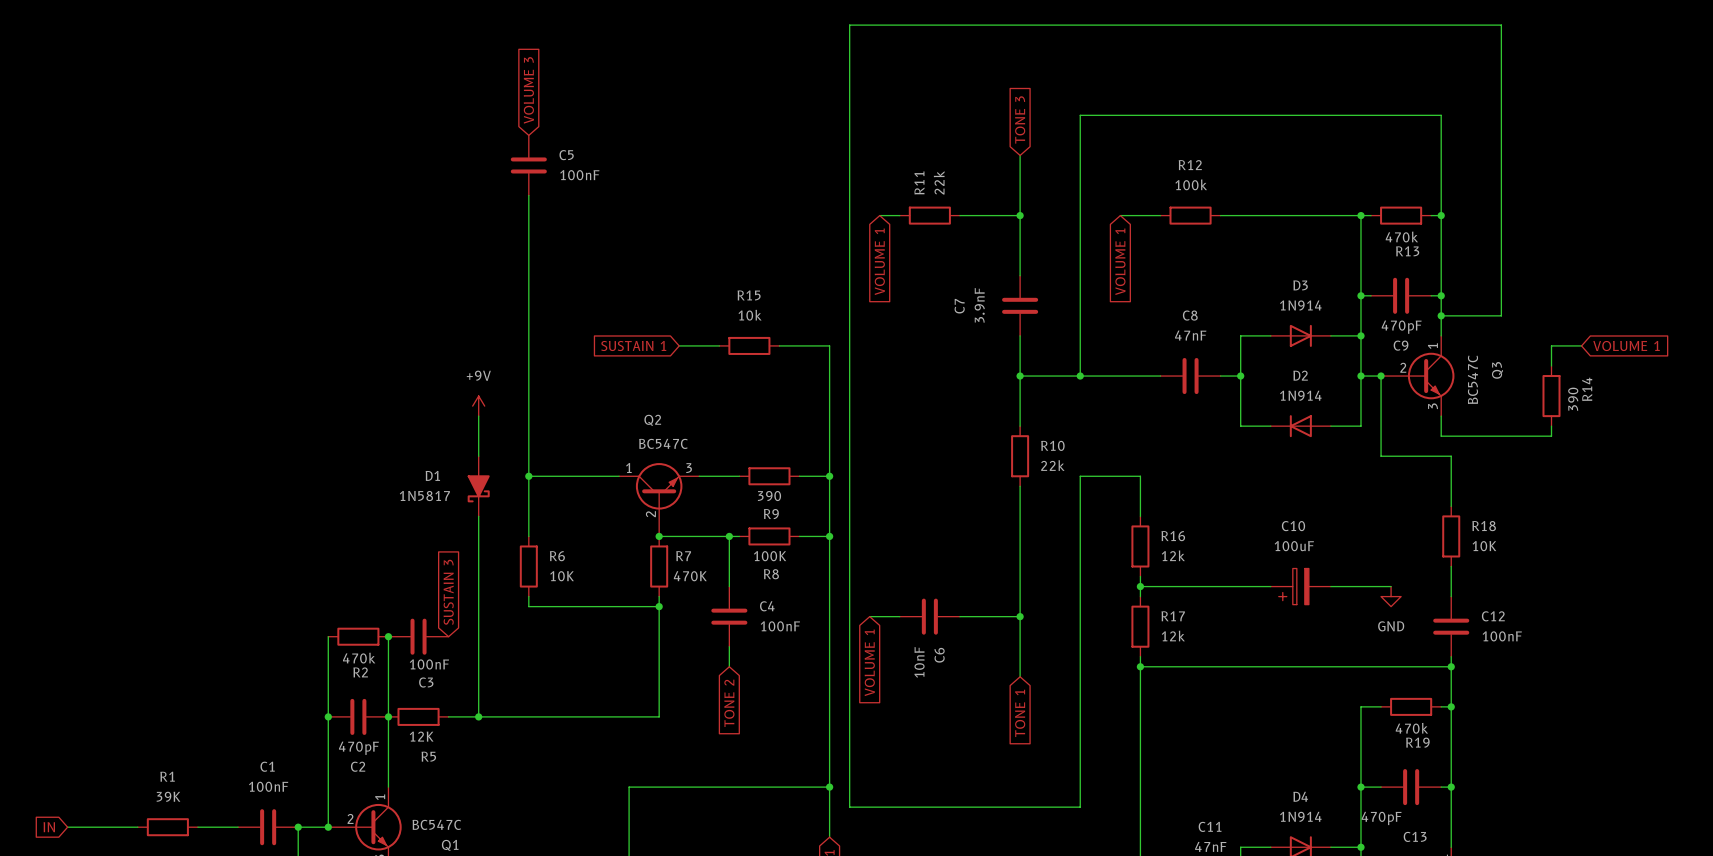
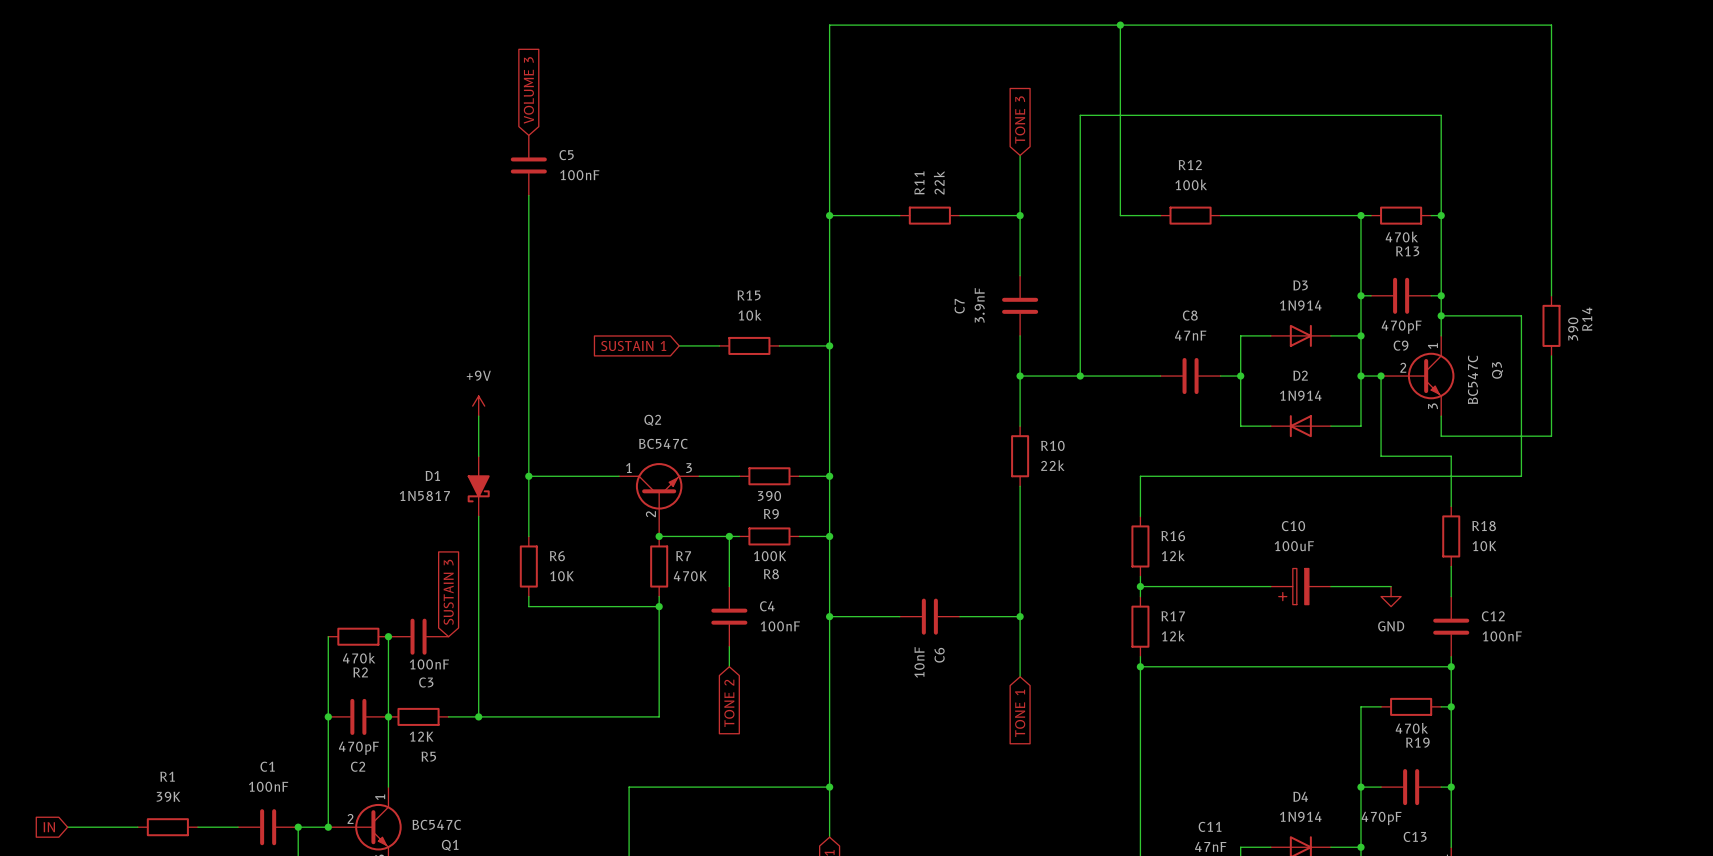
wire: (849, 25) (849, 807) (1080, 807) (1080, 476) (1140, 476) -> (849, 25) (829, 25) (829, 345)
wire: none -> (1120, 25) (1120, 215)
junction: none -> (1120, 25)
wire: (1501, 25) (1501, 315) -> (1501, 25) (1551, 25) (1551, 295)
wire: none -> (829, 215) (879, 215)
junction: none -> (829, 215)
global label: VOLUME 1 (879, 261) -> none
global label: VOLUME 1 (1120, 261) -> none
wire: none -> (1501, 315) (1521, 315) (1521, 476) (1140, 476)
junction: none -> (829, 345)
wire: (1581, 345) (1551, 345) (1551, 355) -> none
global label: VOLUME 1 (1626, 346) -> none
wire: none -> (1551, 365) (1551, 426)
R14 position: (1551, 396) -> (1551, 325)
wire: none -> (829, 616) (869, 616)
junction: none -> (829, 616)
global label: VOLUME 1 (869, 662) -> none

